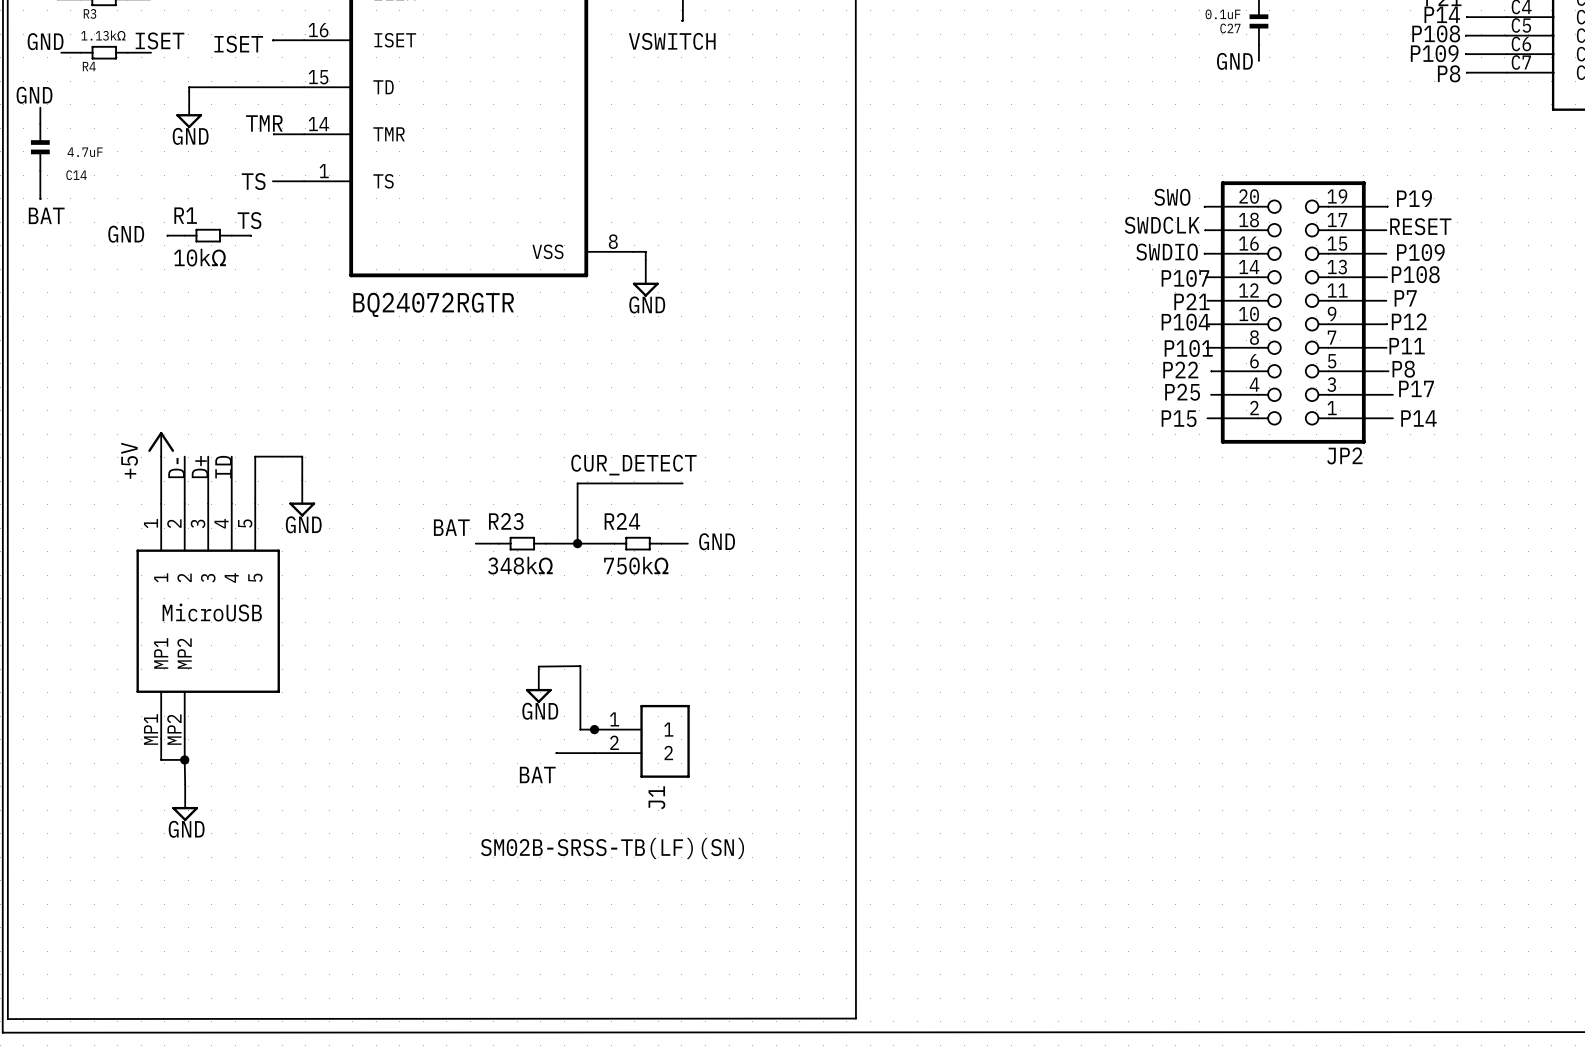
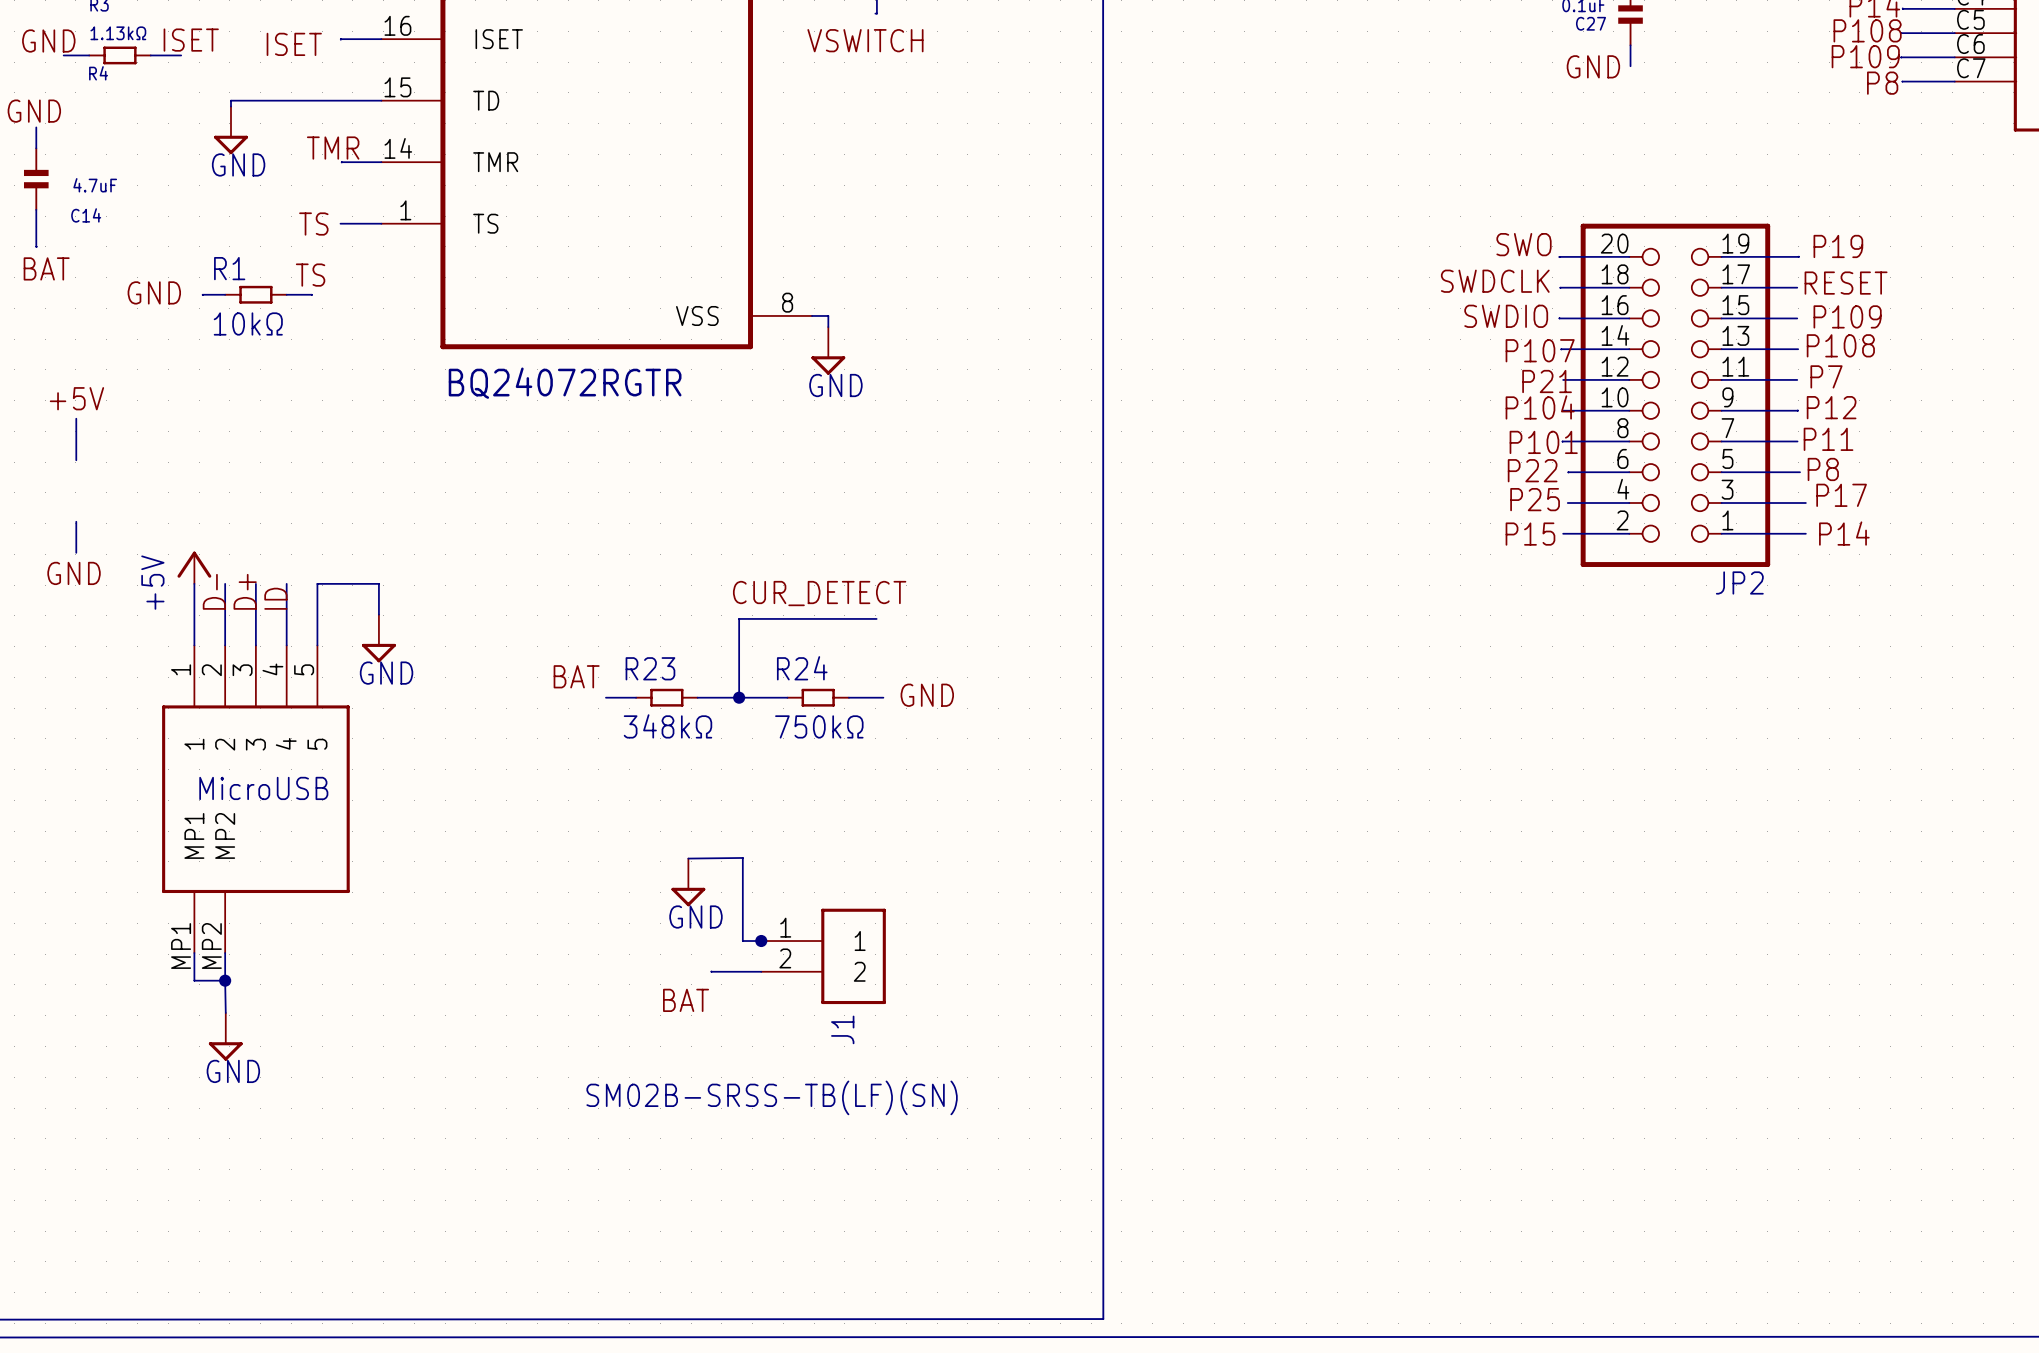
label: none -> +5V (76, 398)
wire: none -> (76, 418) (76, 460)
wire: none -> (76, 521) (76, 552)
label: none -> GND (74, 573)

